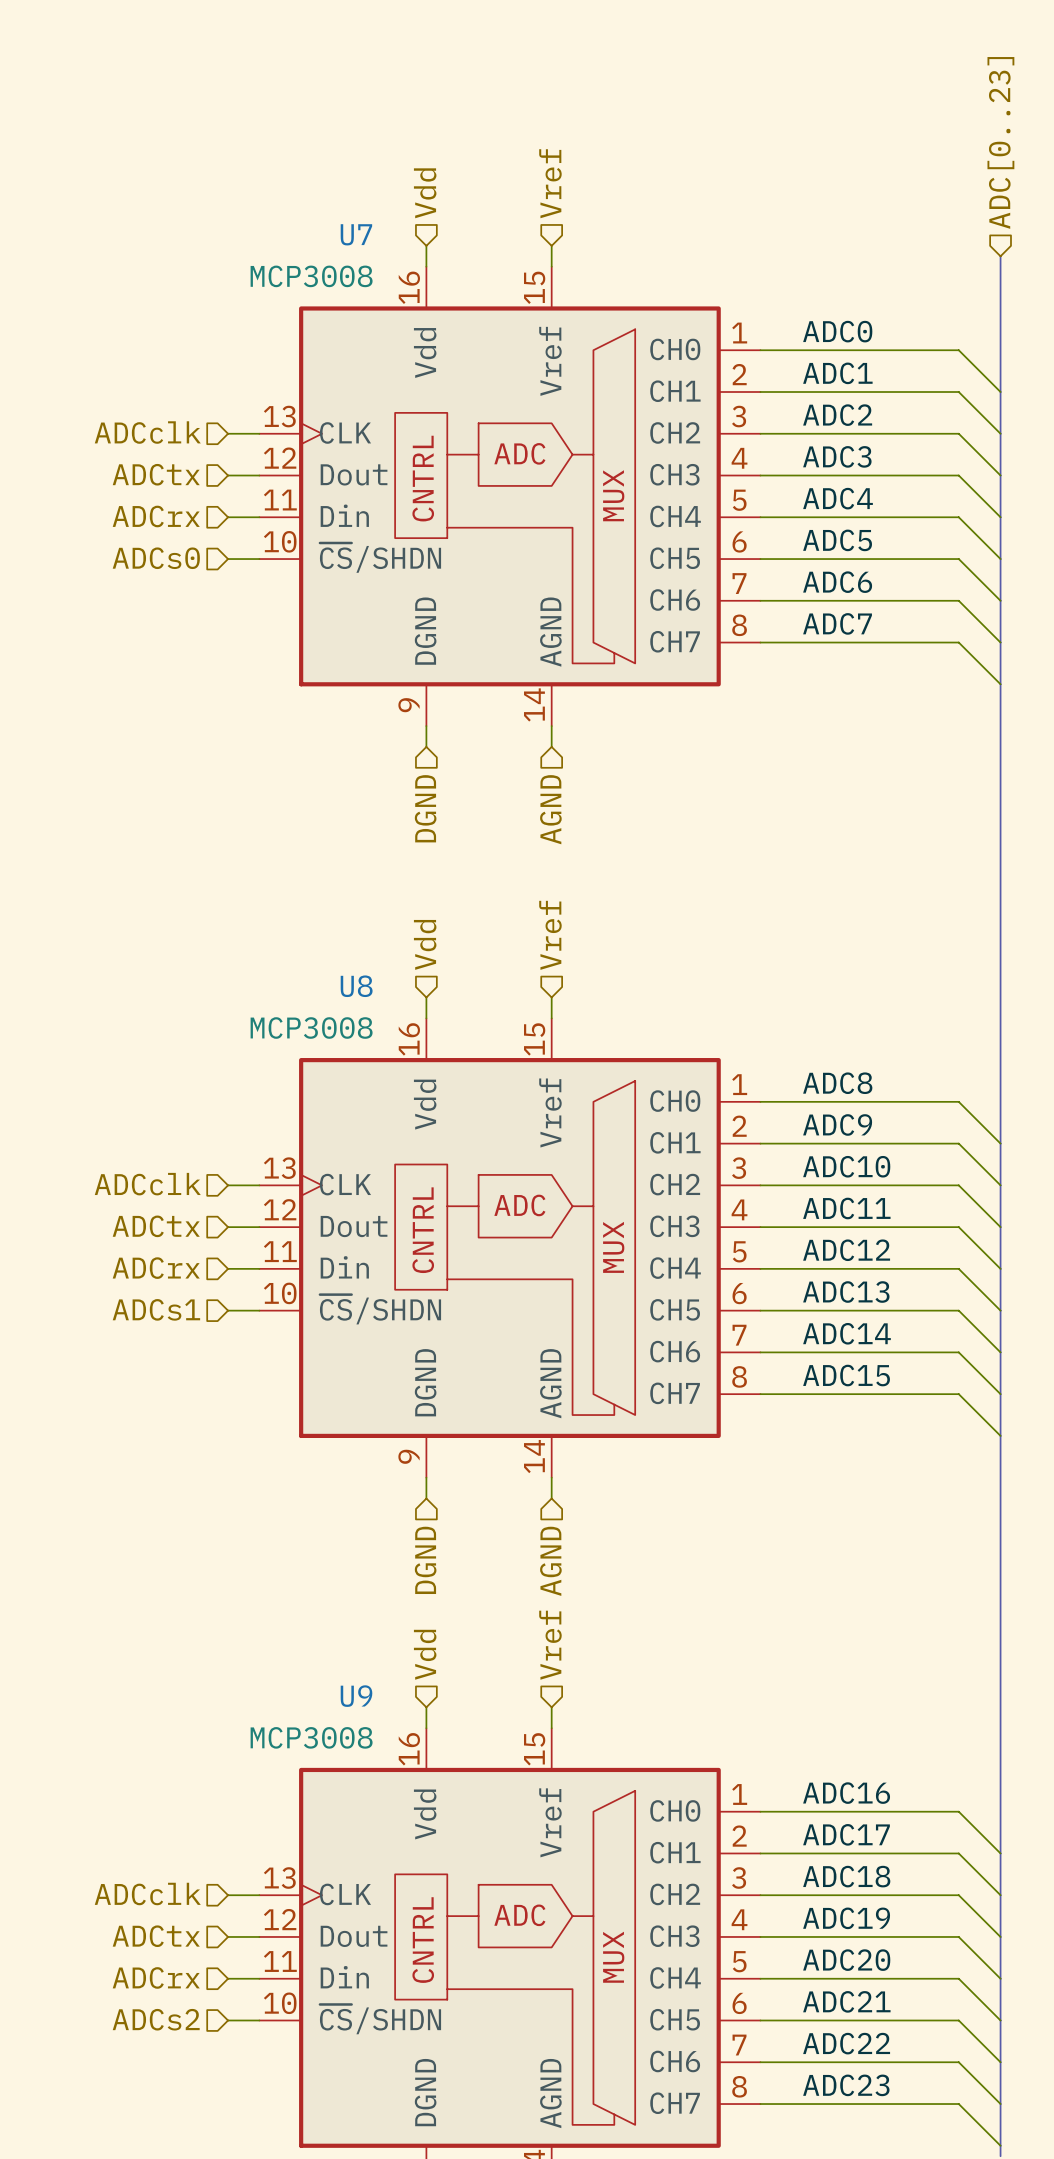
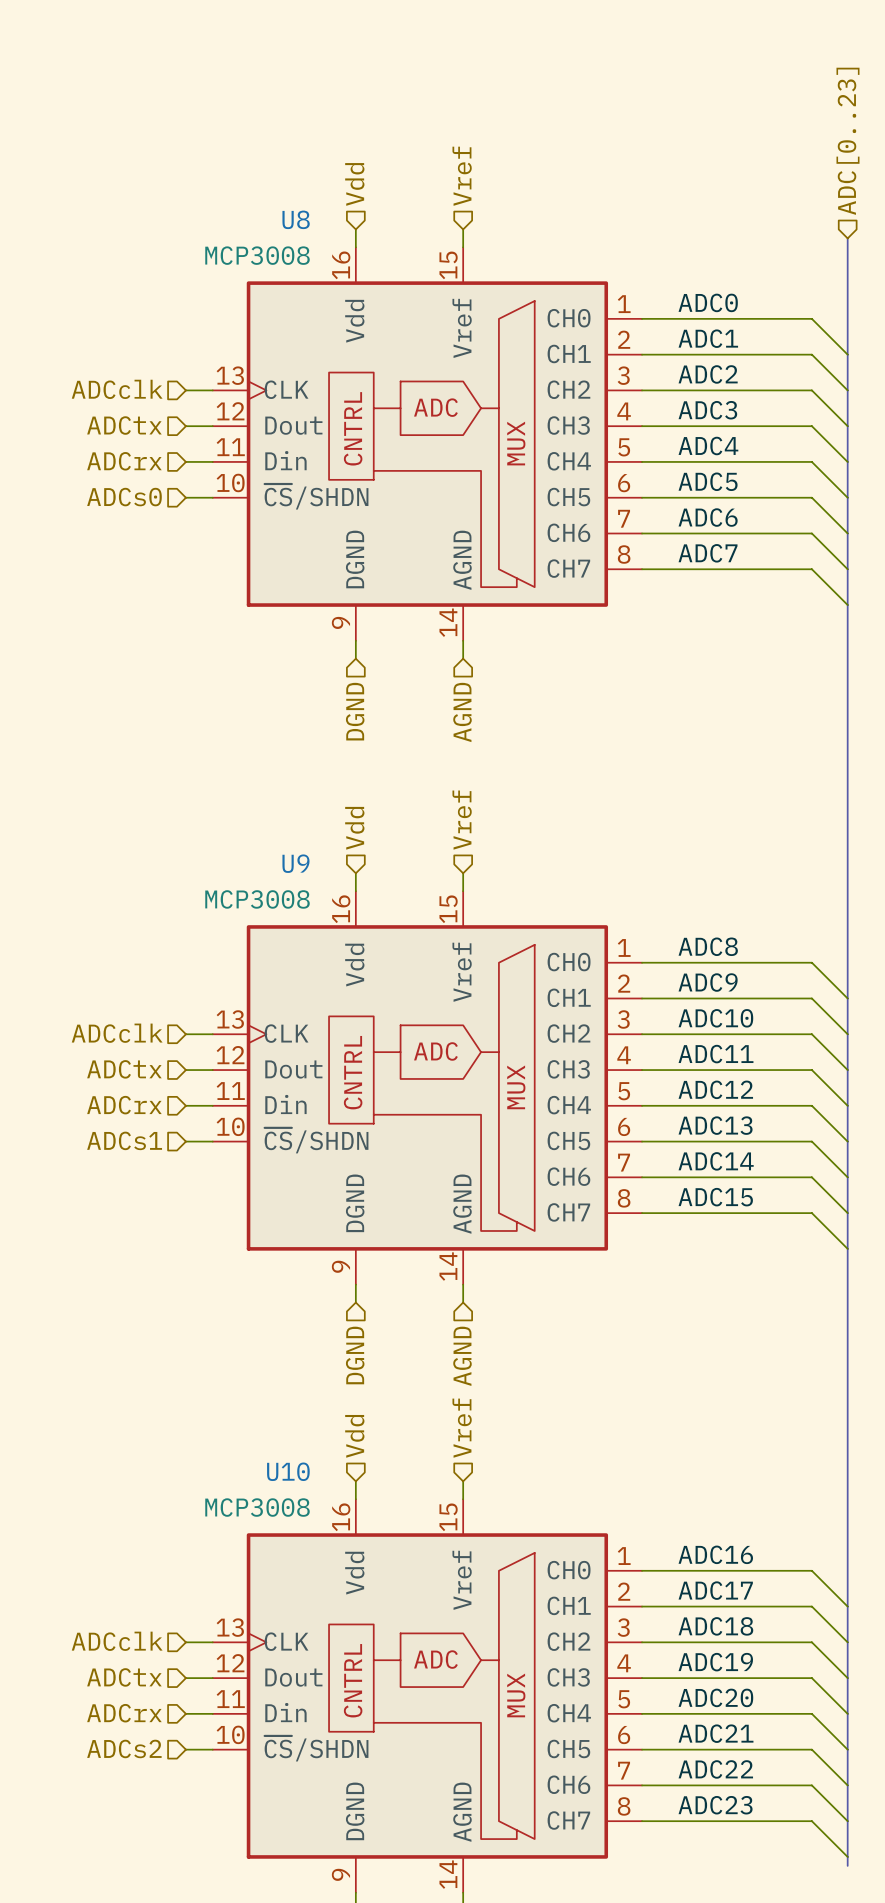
U7 name: U7 (356, 234) -> U8 (296, 219)
U8 name: U8 (356, 986) -> U9 (295, 863)
U9 name: U9 (356, 1696) -> U10 (288, 1471)

